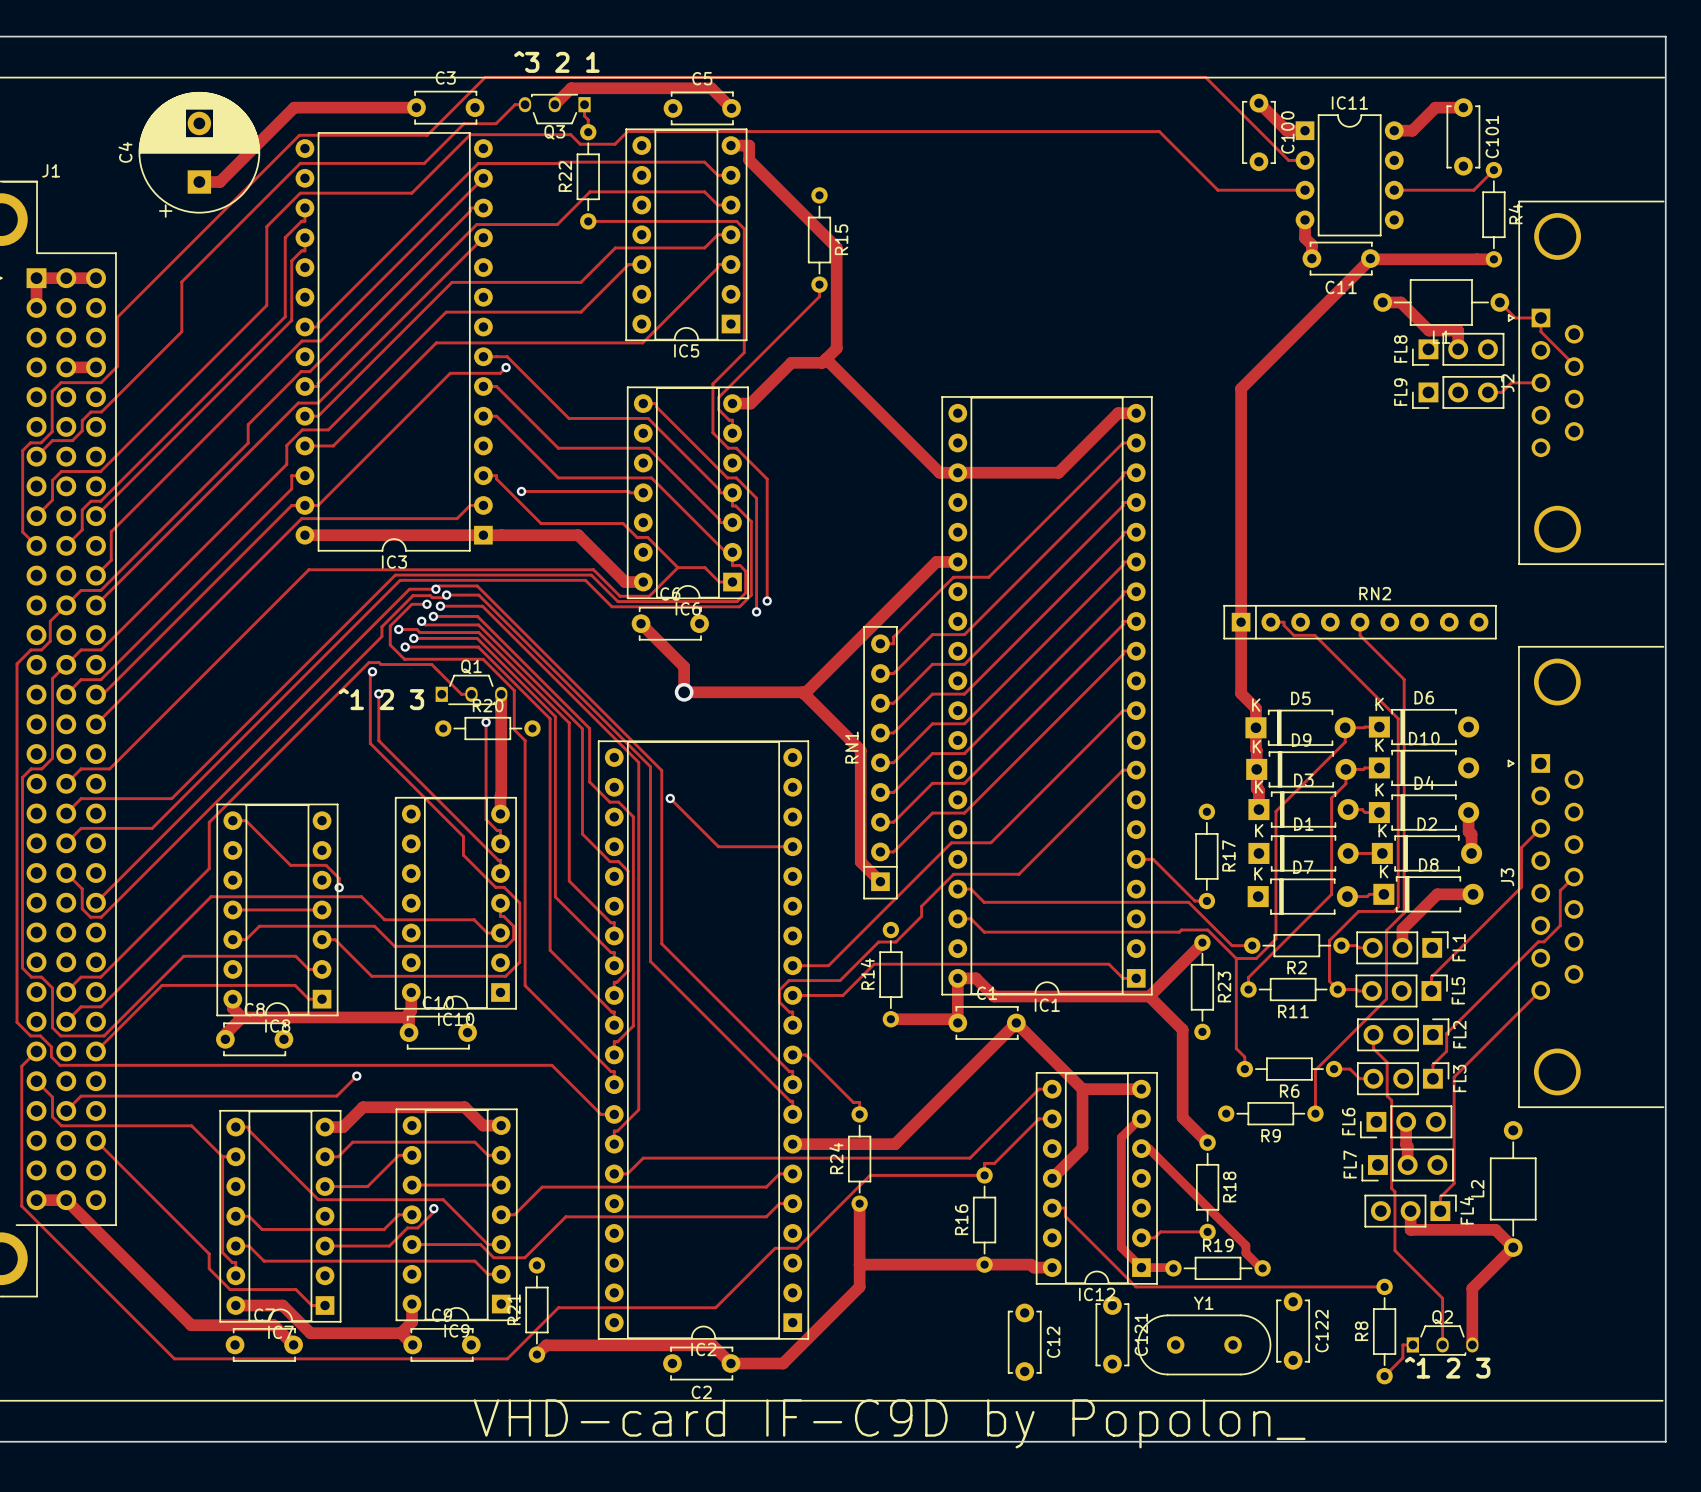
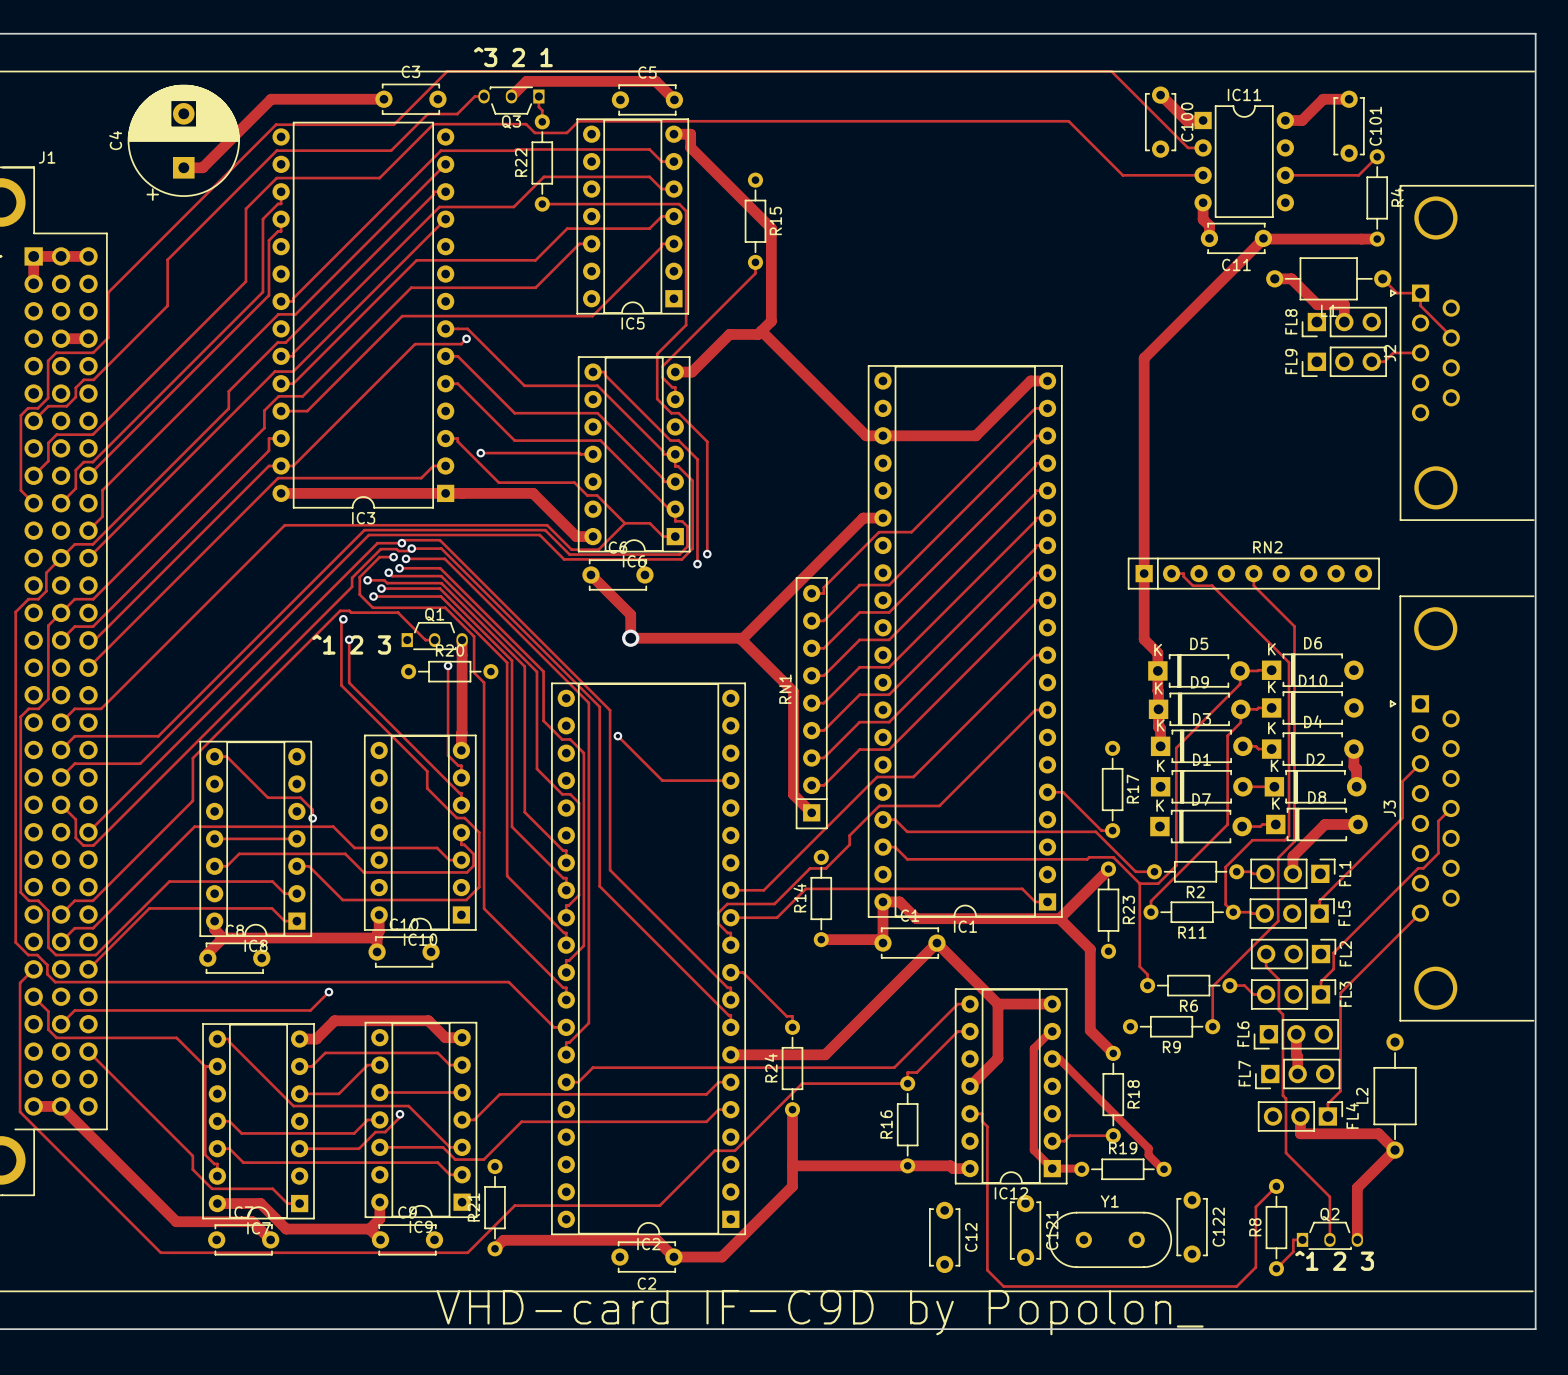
track: (1071, 1222) (1135, 1286) (1384, 1286) -> (987, 1126) (987, 1270) (1003, 1286) (1236, 1286) (1255, 1267) (1255, 1206) (1276, 1186)

